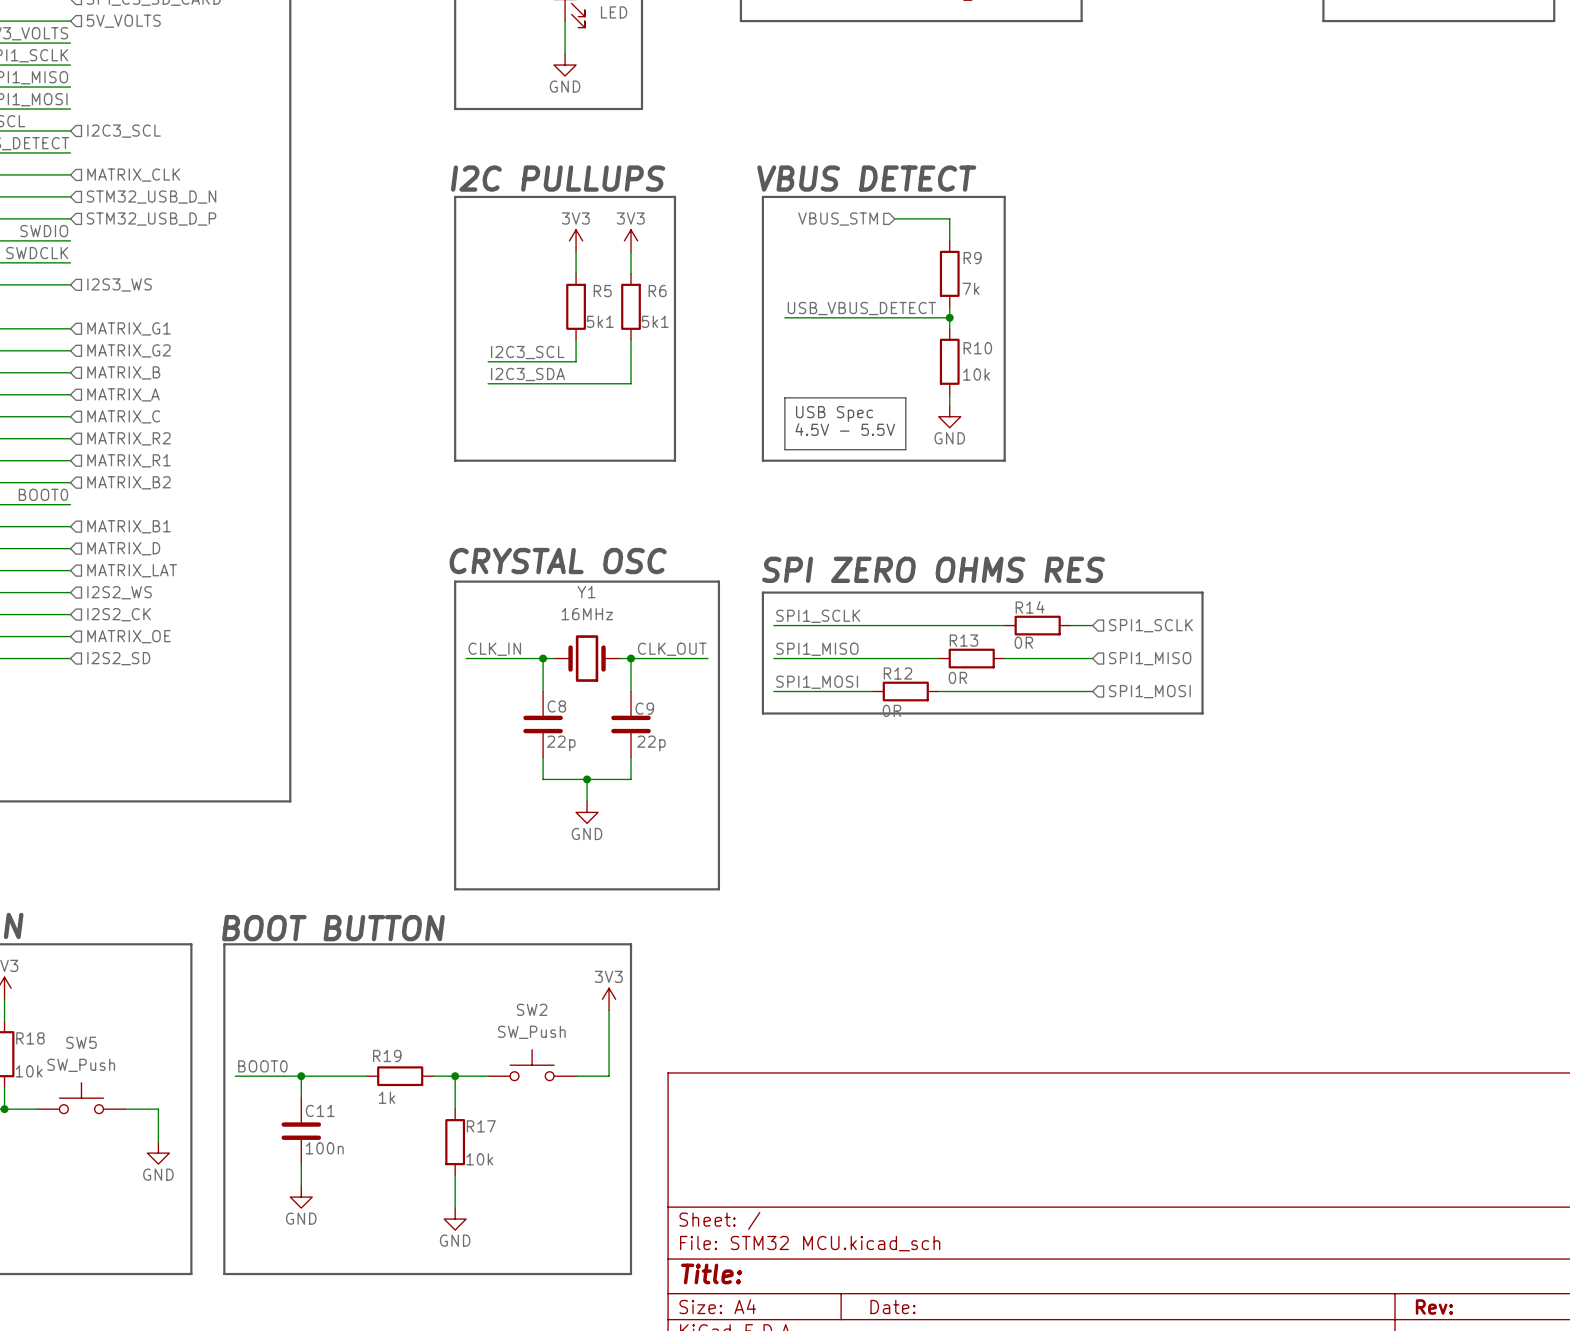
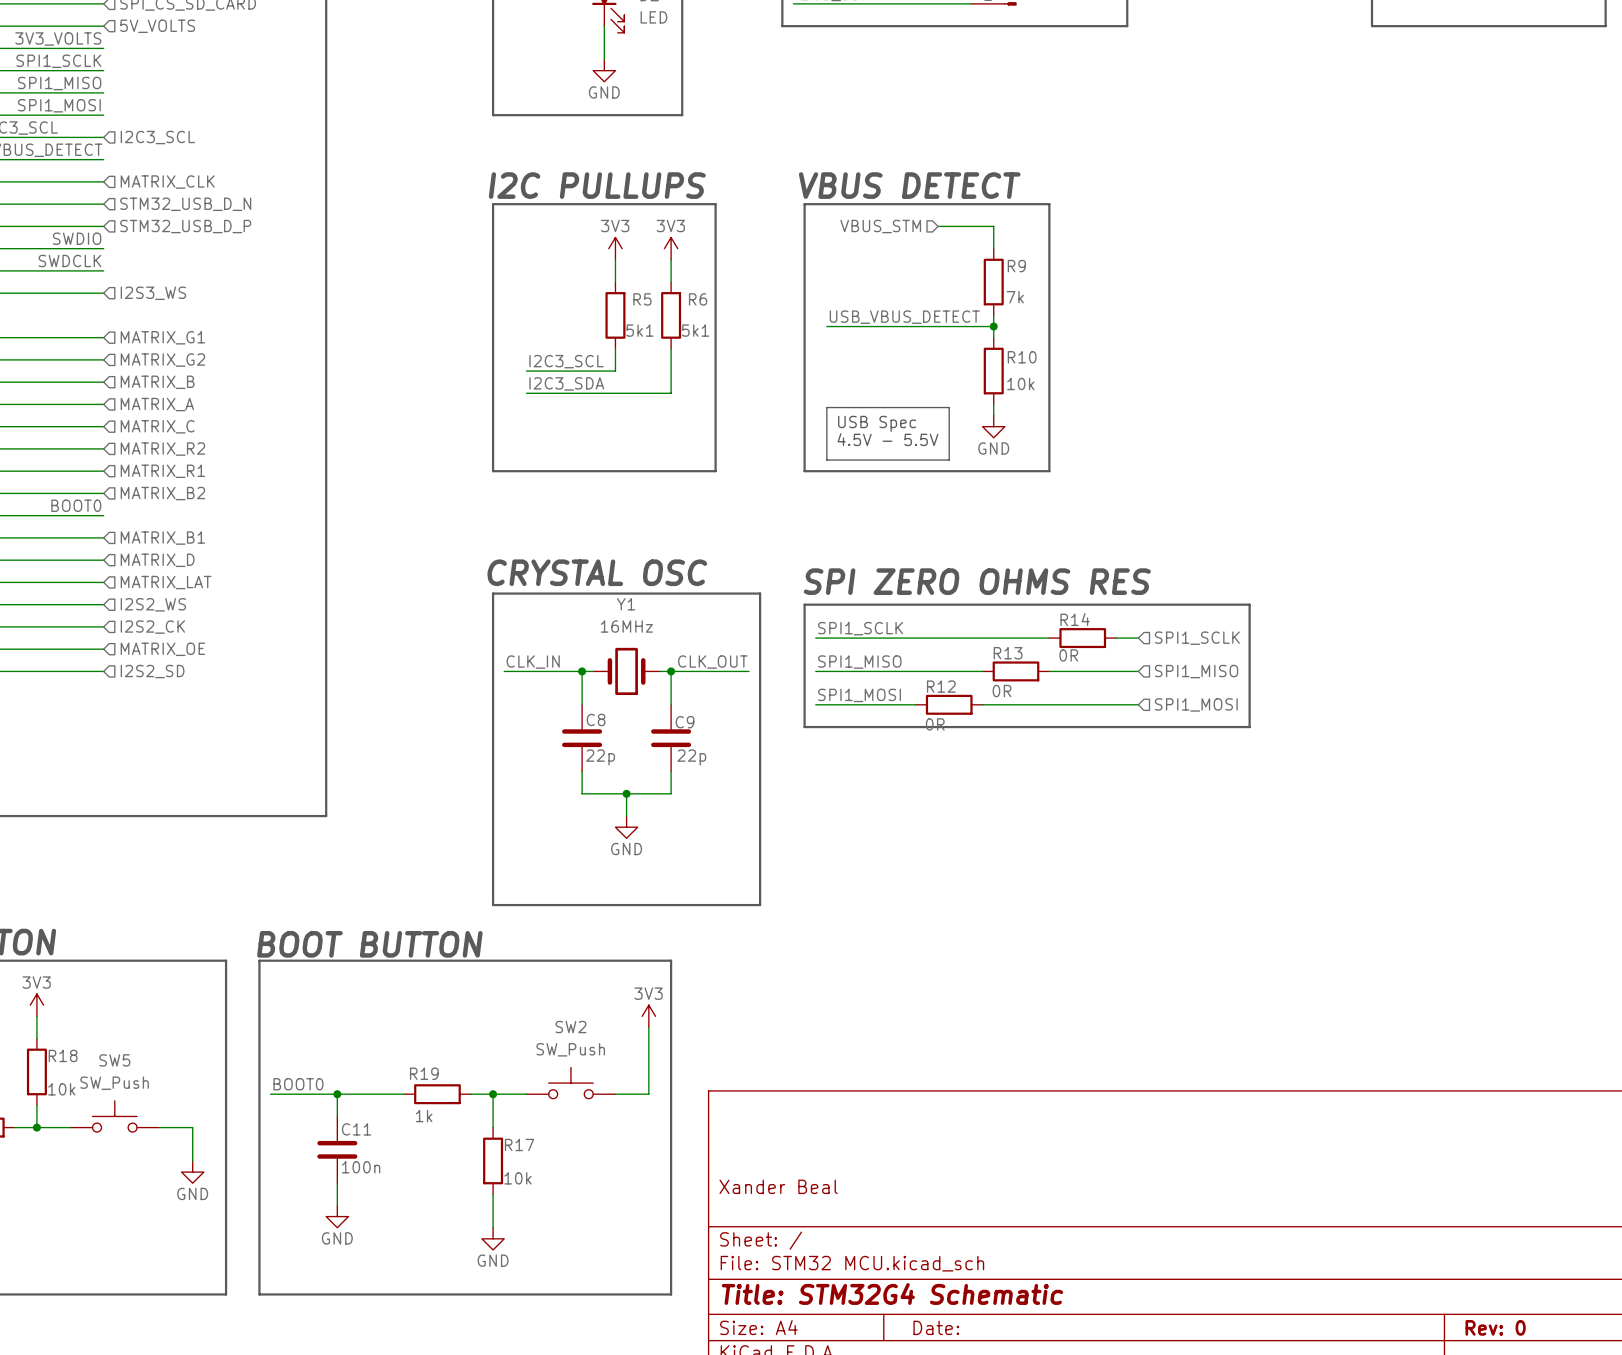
title block: none -> Xander Beal (778, 1186)
title block: Title: (711, 1273) -> Title: STM32G4 Schematic (892, 1294)
title block: Rev: (1434, 1307) -> Rev: 0 (1495, 1327)

